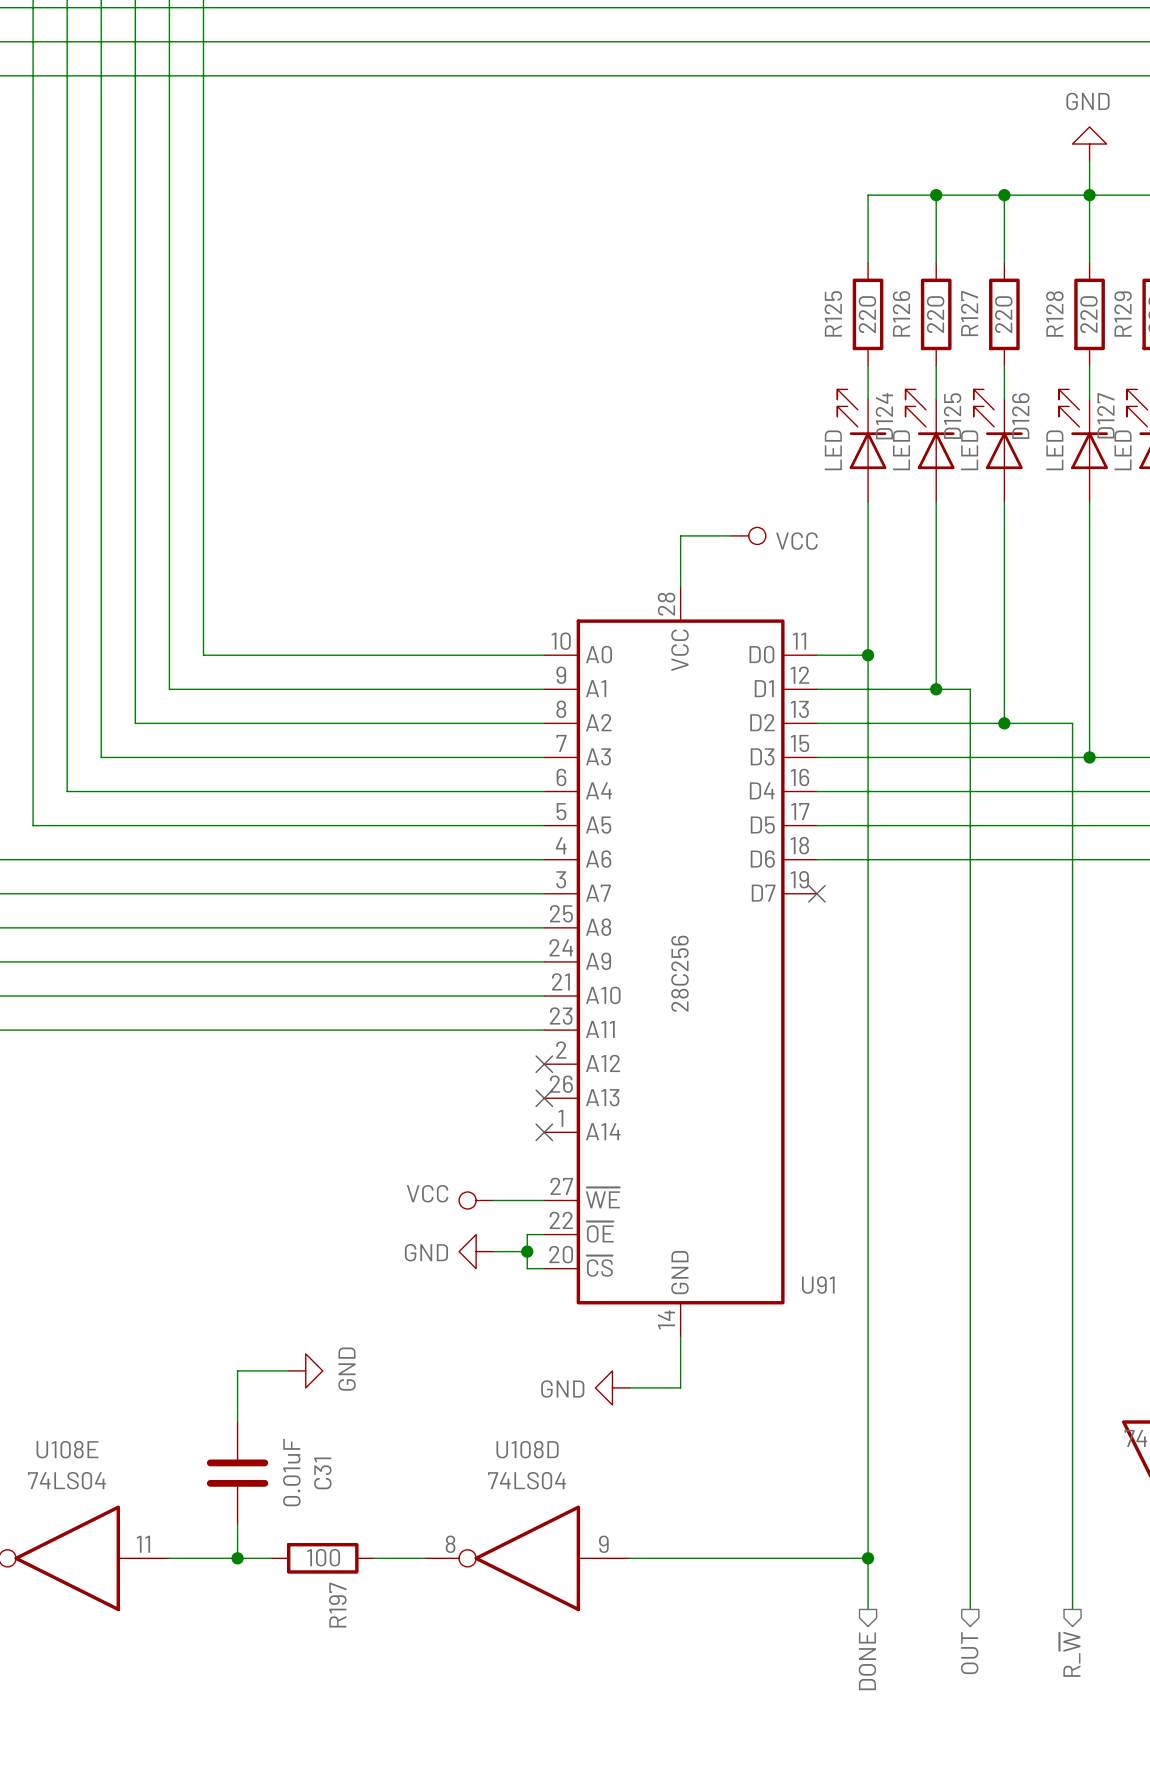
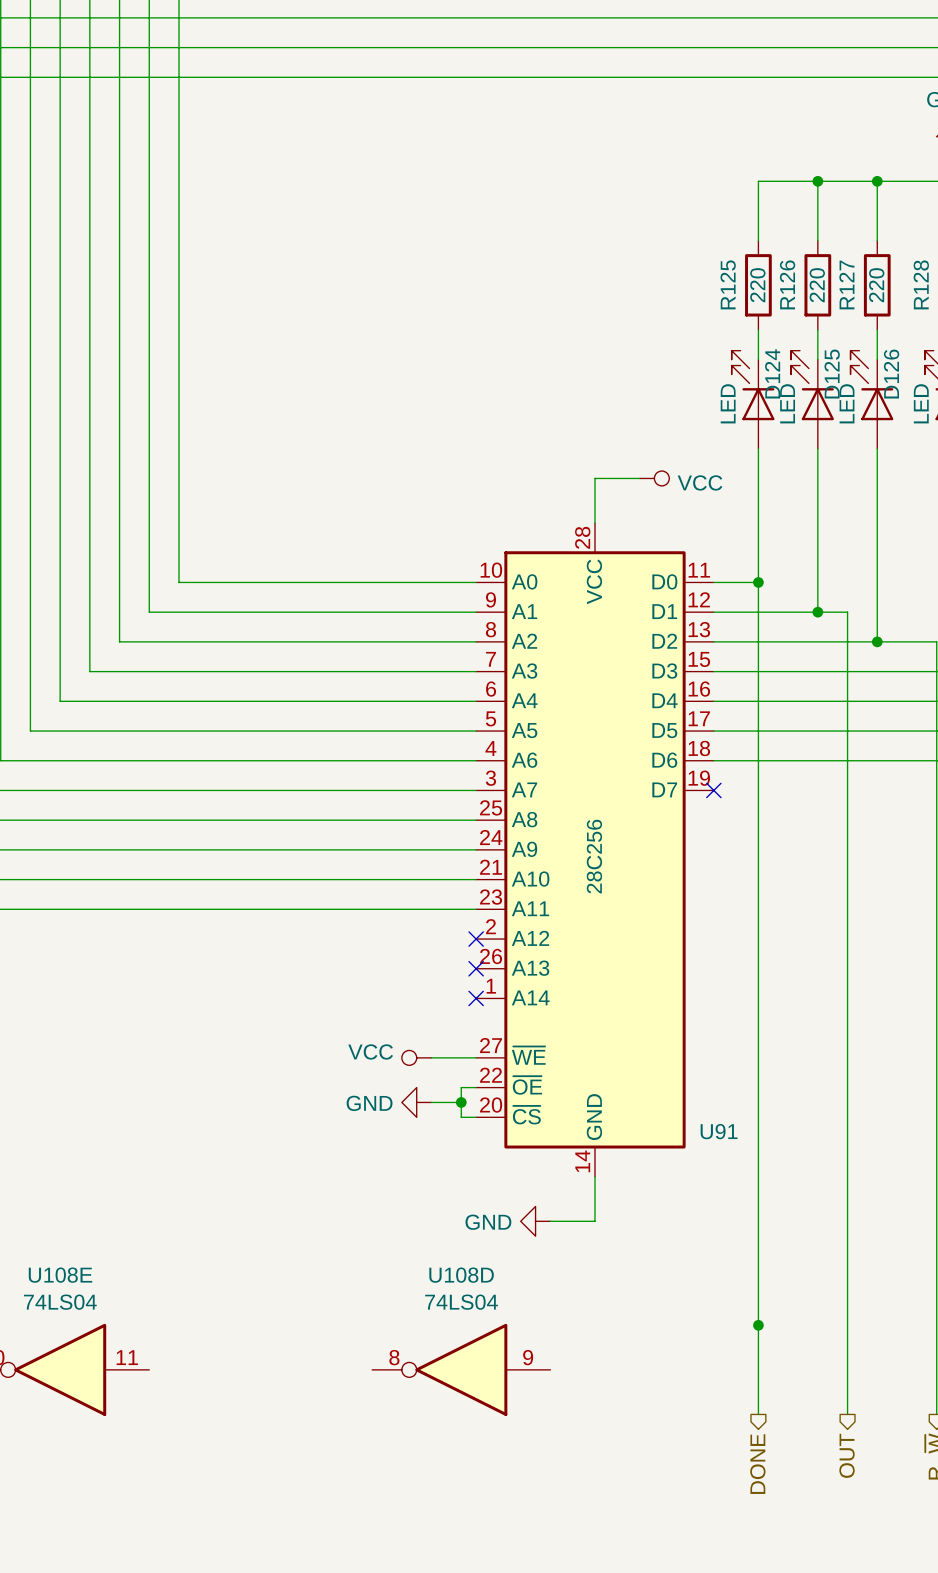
wire: (288, 1370) (237, 1370) (237, 1422) -> none
power symbol: GND (305, 1370) -> none
C31: 0.01uF (237, 1473) -> none
wire: (237, 1524) (237, 1558) -> none
wire: (169, 1558) (271, 1558) -> none
junction: (237, 1558) -> none
R197: 100 (322, 1558) -> none
wire: (373, 1558) (425, 1558) -> none
wire: (629, 1558) (868, 1558) -> none
junction position: (868, 1558) -> (758, 1325)

